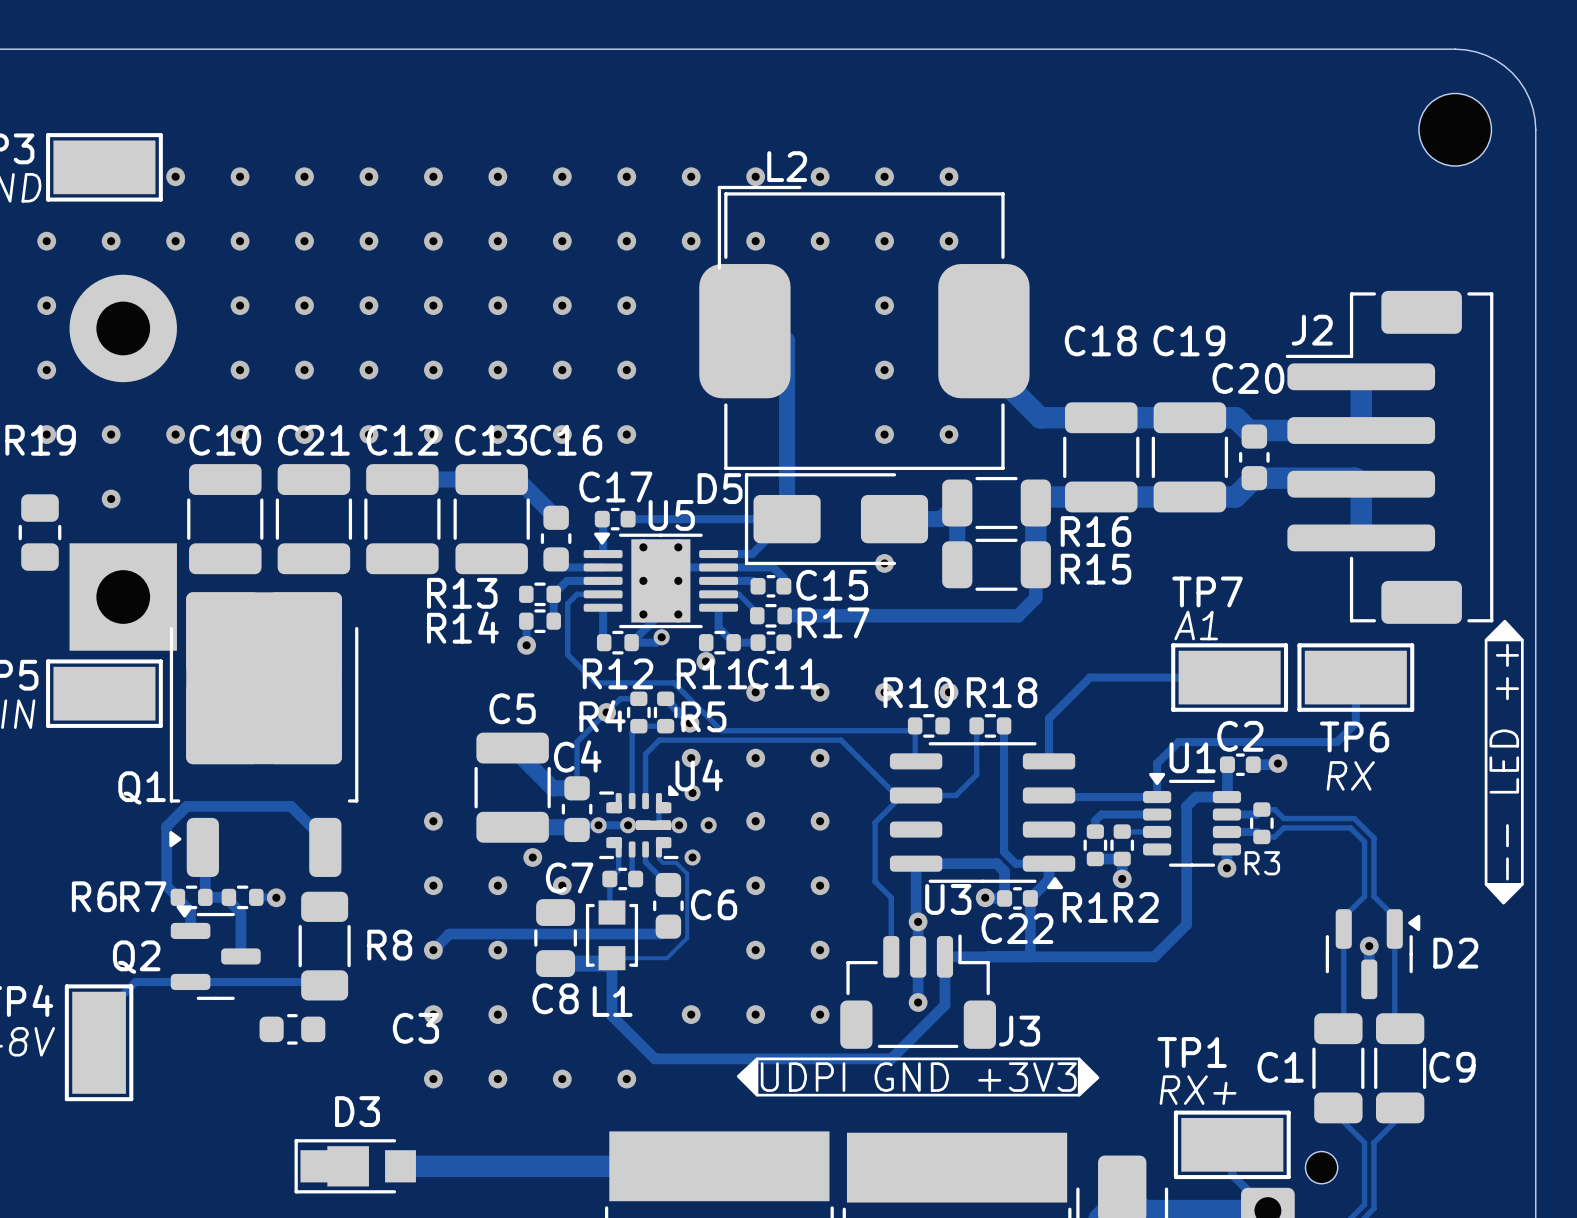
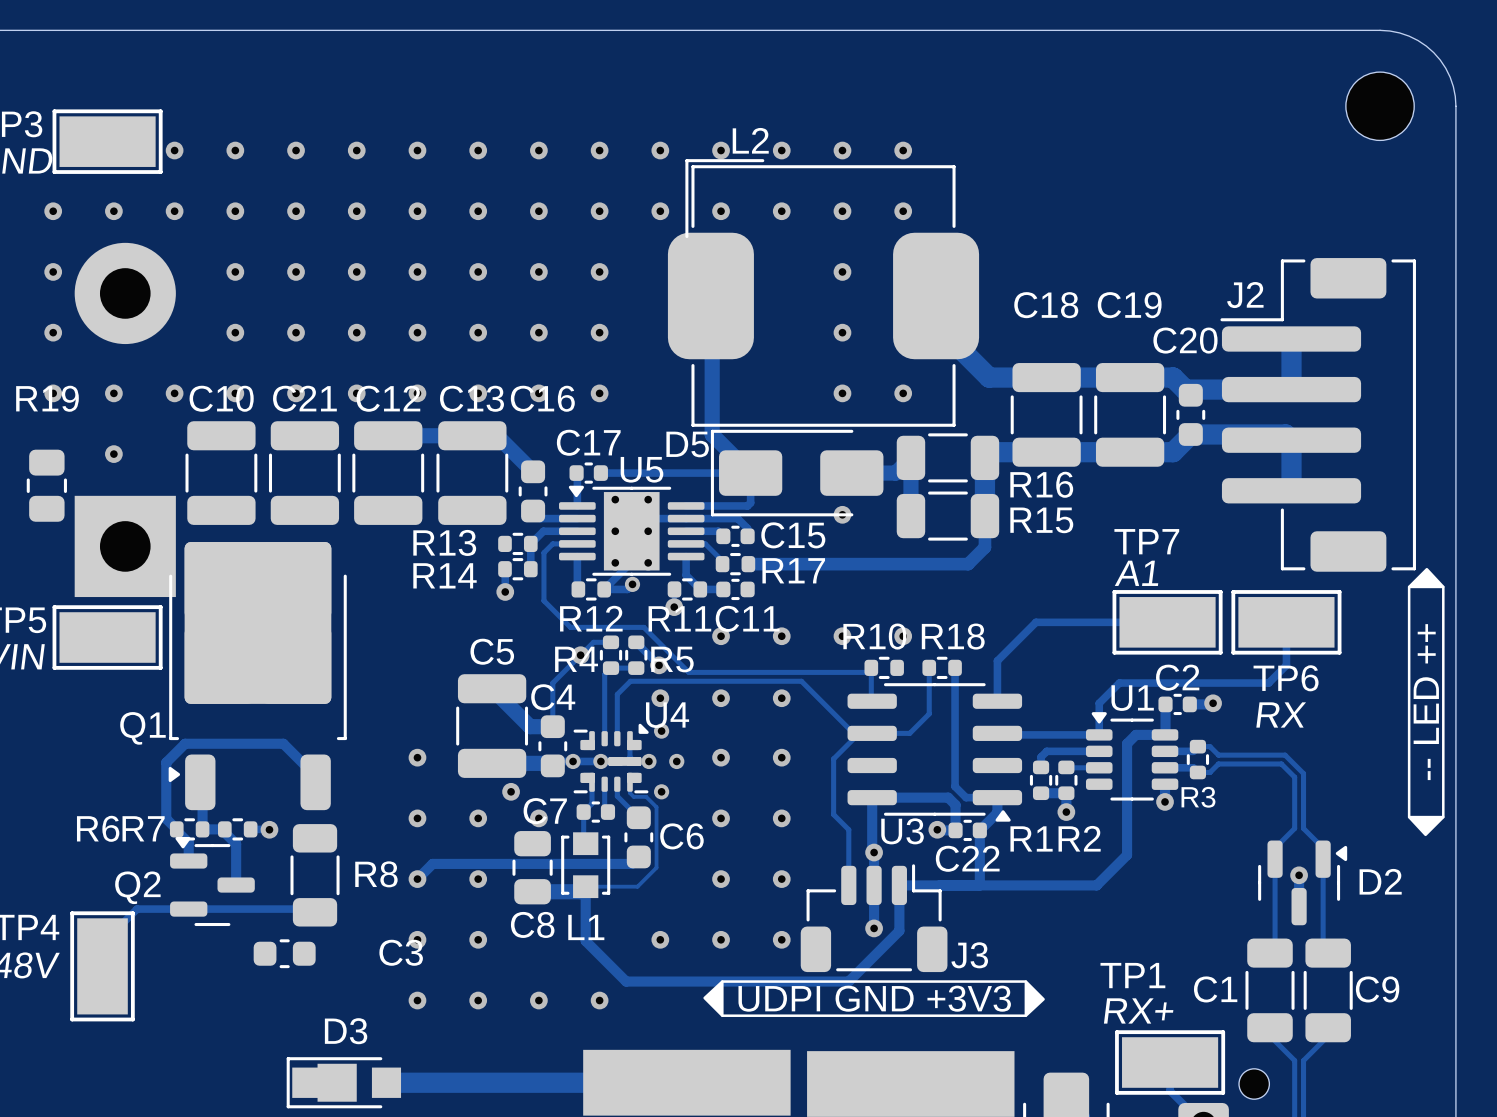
track: (746, 299) (787, 340) (787, 519) (752, 554) -> (712, 266) (712, 434) (750, 473) (750, 502) (747, 505) (717, 505)

